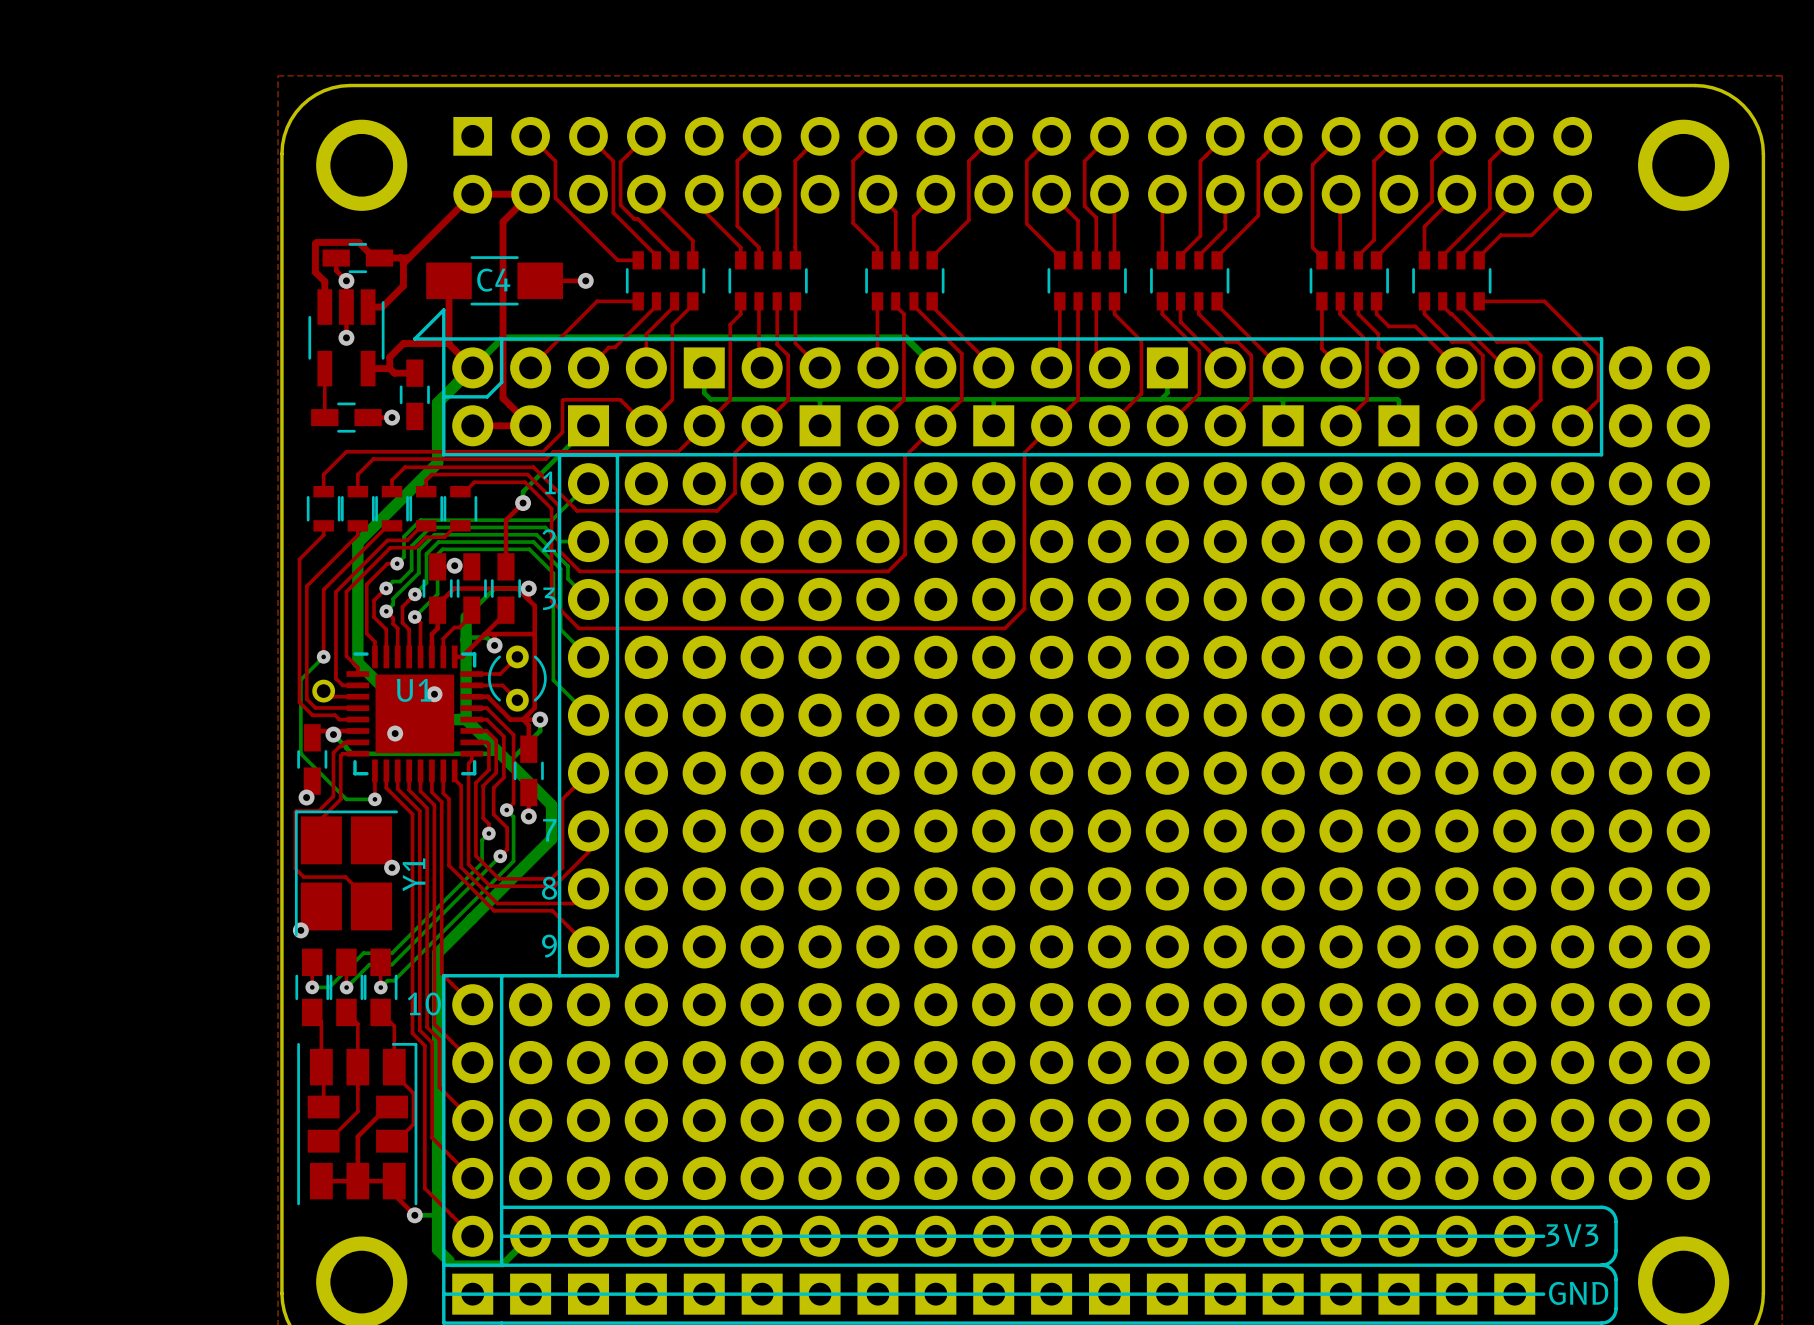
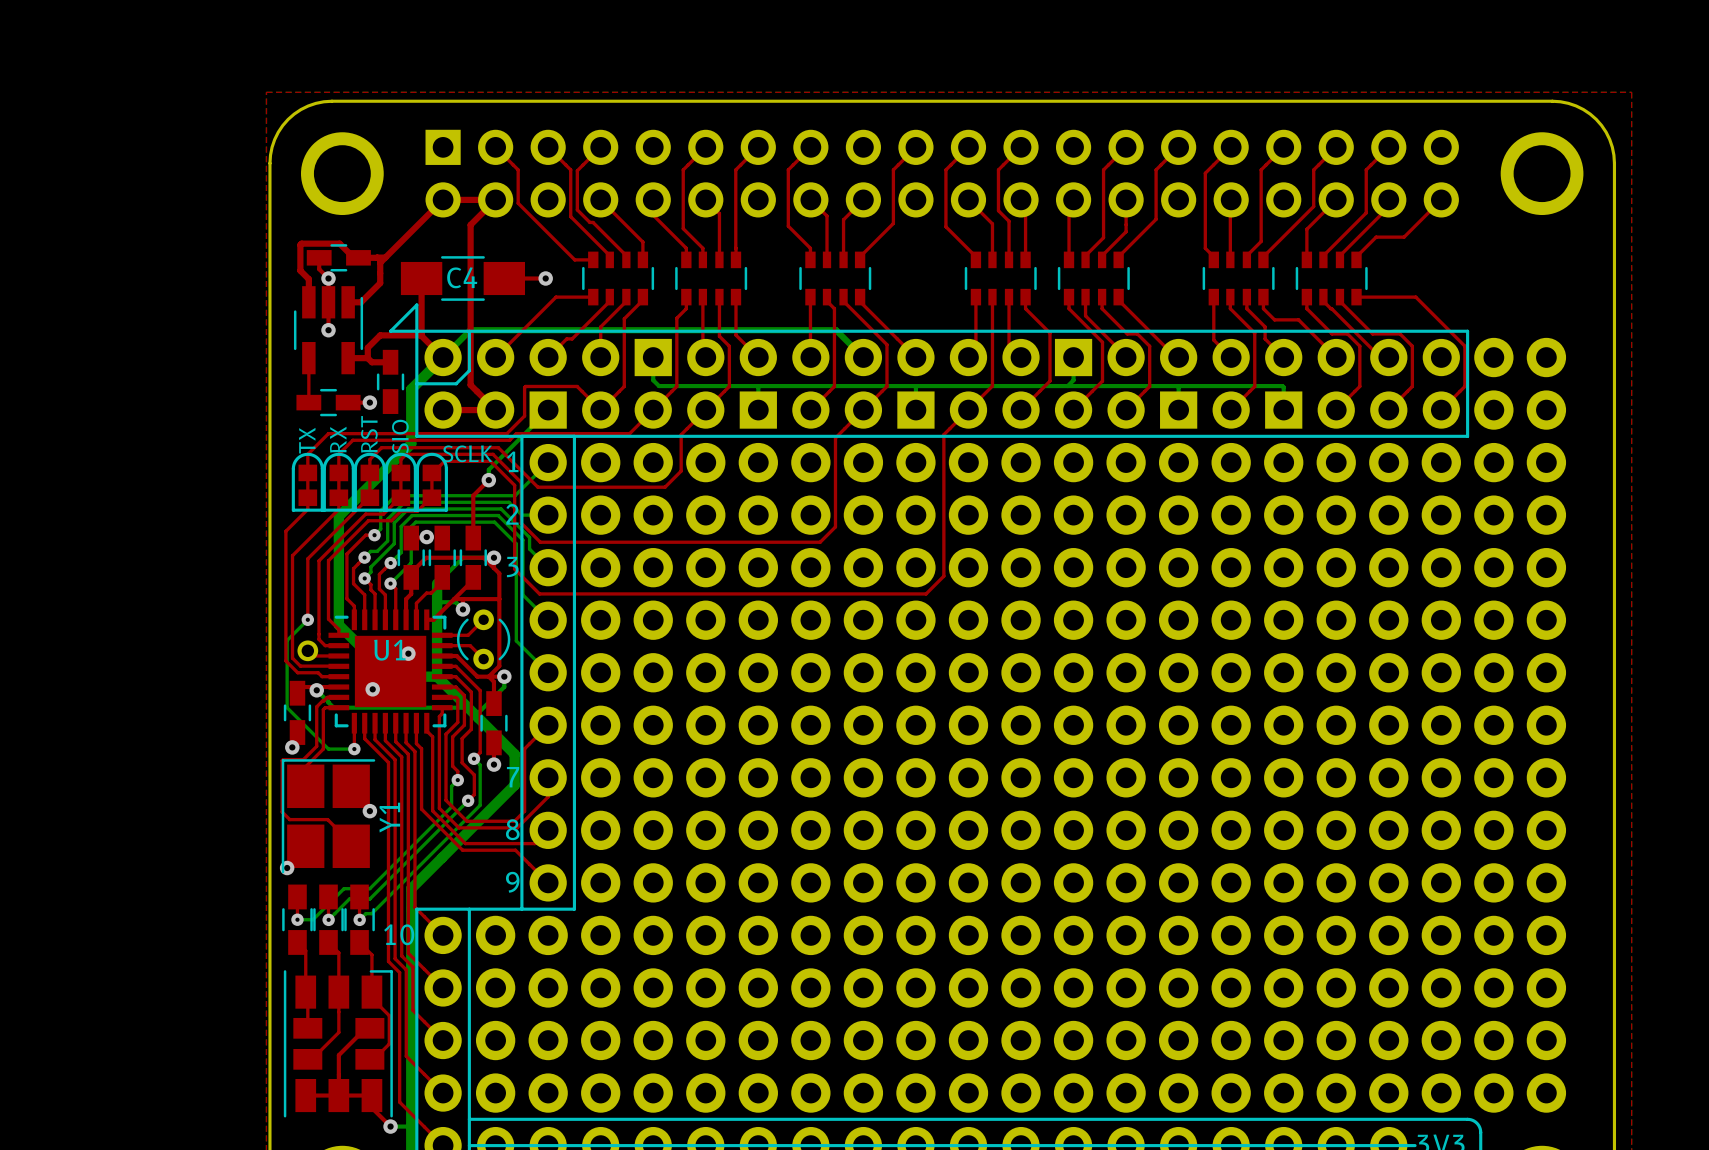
text: none -> RST (369, 434)
text: none -> SIO (400, 436)
text: none -> RX (338, 439)
text: none -> TX (307, 440)
text: none -> SCLK (467, 453)
part footprint: [306, 485, 341, 532] -> [291, 452, 324, 512]
part footprint: [340, 485, 375, 532] -> [322, 452, 355, 512]
part footprint: [375, 485, 409, 532] -> [353, 452, 386, 512]
part footprint: [409, 485, 444, 532] -> [384, 452, 417, 512]
part footprint: [443, 485, 478, 532] -> [415, 452, 448, 512]

